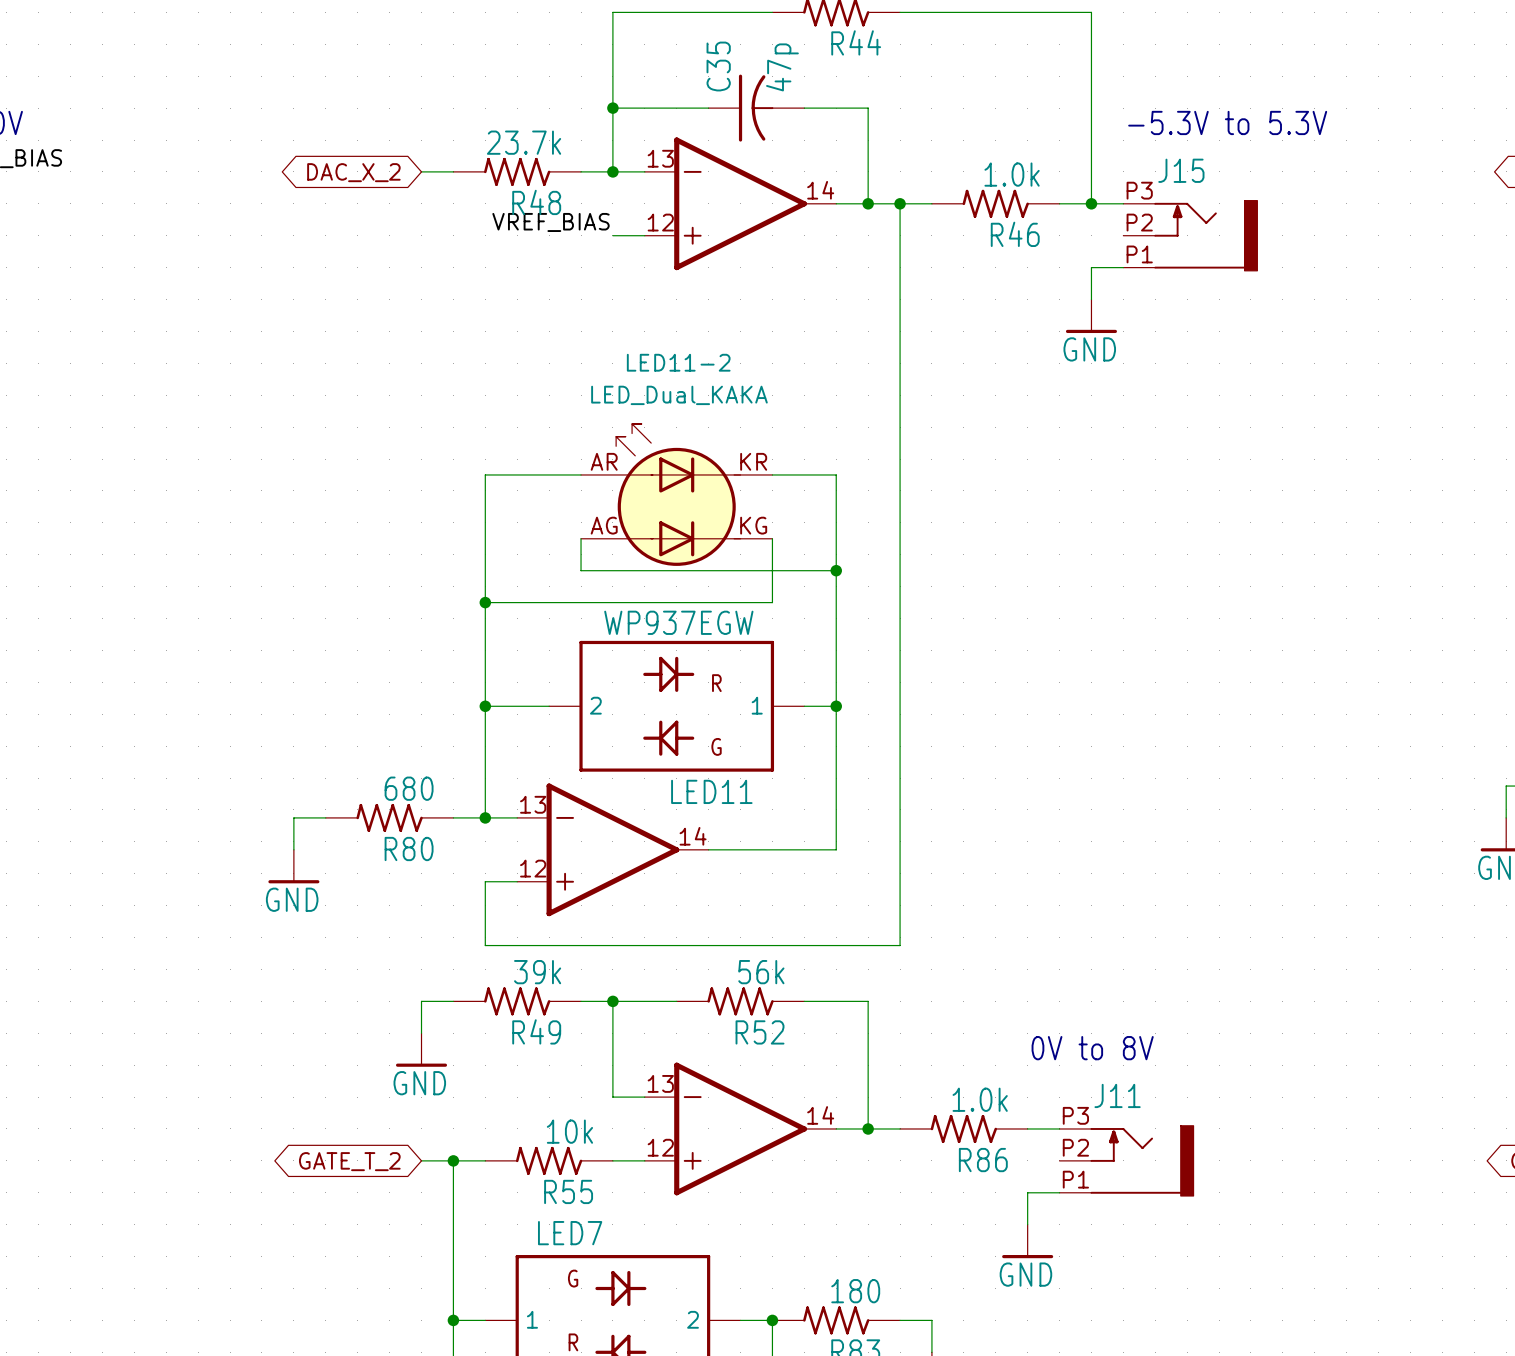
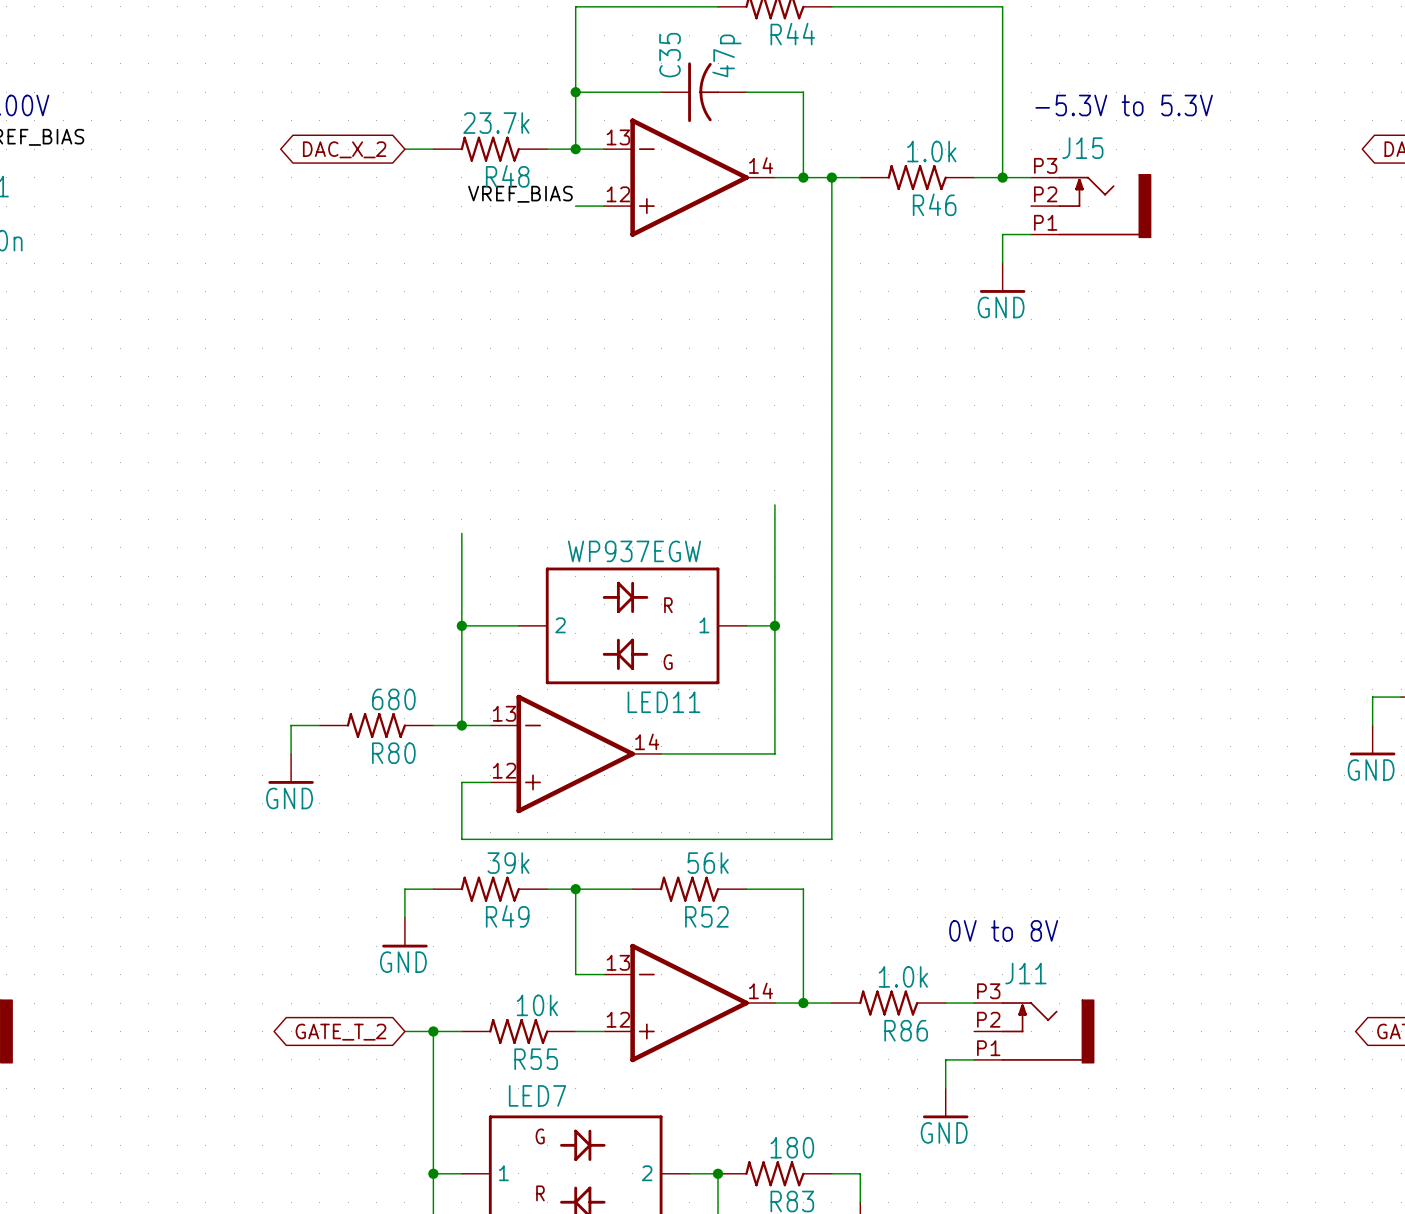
wire: (581, 474) (485, 474) (485, 602) (772, 602) (772, 538) -> none
wire: (772, 474) (836, 474) (836, 570) (581, 570) (581, 538) -> none
LED11-2: LED_Dual_KAKA (676, 494) -> none
junction: (836, 570) -> none
junction: (485, 602) -> none

